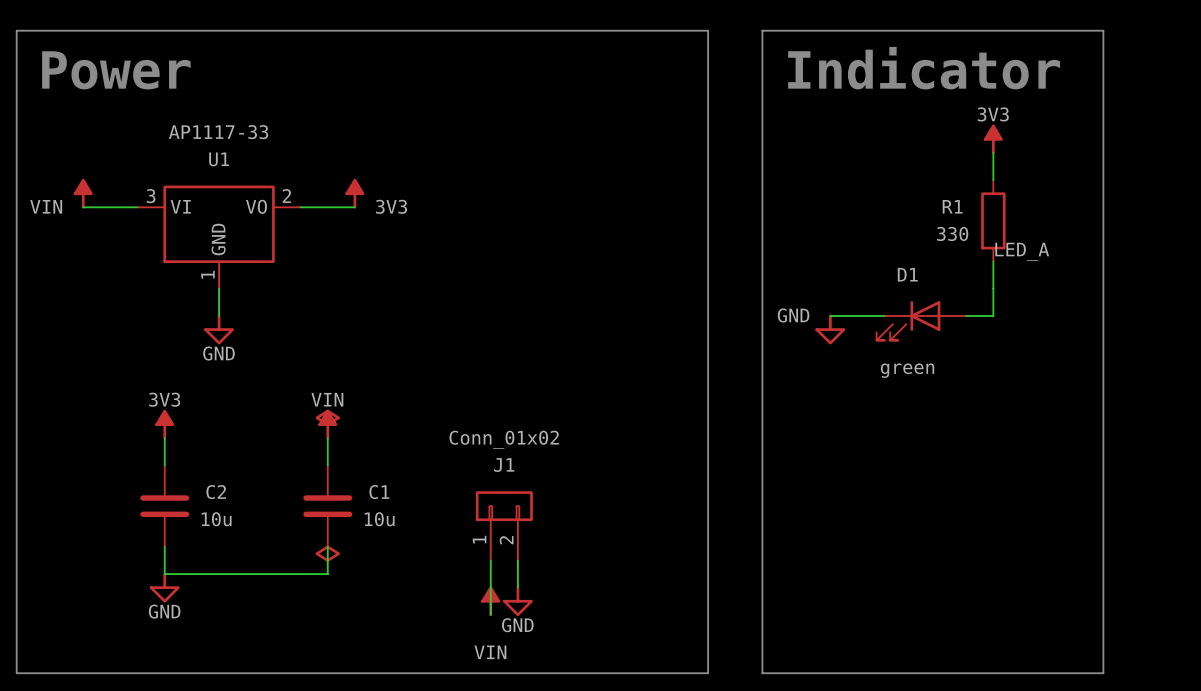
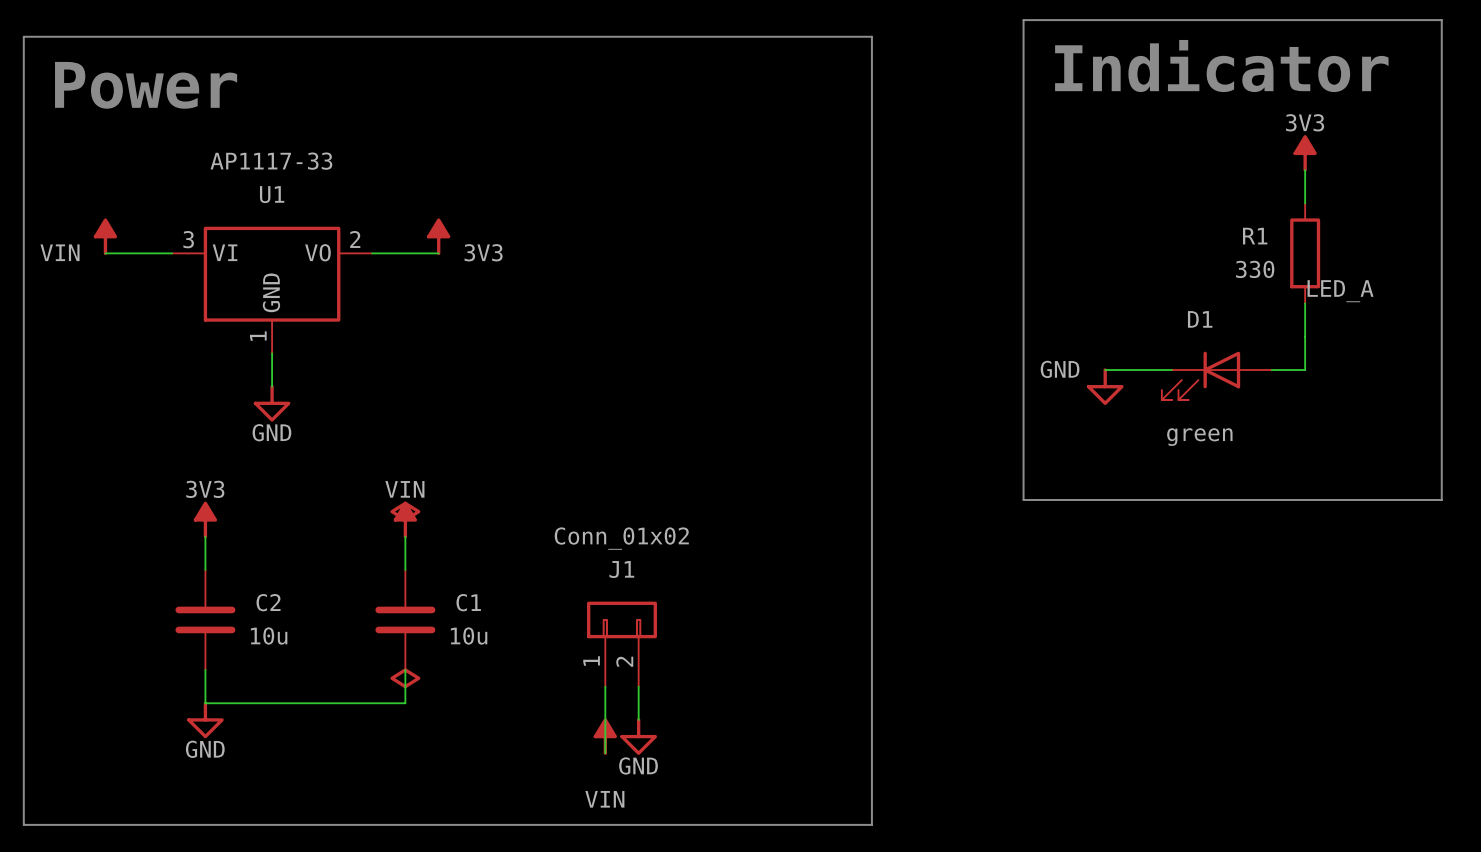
line: none -> (1023, 20) (1441, 20) (1441, 499) (1023, 499) (1023, 20)
line: (762, 30) (1103, 30) (1103, 673) (762, 673) (762, 30) -> none
text position: Indicator (924, 68) -> Indicator (1221, 66)
power symbol position: 3V3 (993, 139) -> 3V3 (1305, 153)
wire: (993, 152) (993, 180) -> (1305, 170) (1305, 203)
R1 position: (993, 220) -> (1305, 253)
label position: LED_A (1022, 251) -> LED_A (1340, 291)
wire: (993, 261) (993, 315) (966, 315) -> (1305, 303) (1305, 370) (1271, 370)
wire: (830, 315) (884, 315) -> (1105, 370) (1171, 370)
D1 position: (921, 320) -> (1216, 375)
power symbol position: GND (830, 329) -> GND (1105, 386)

